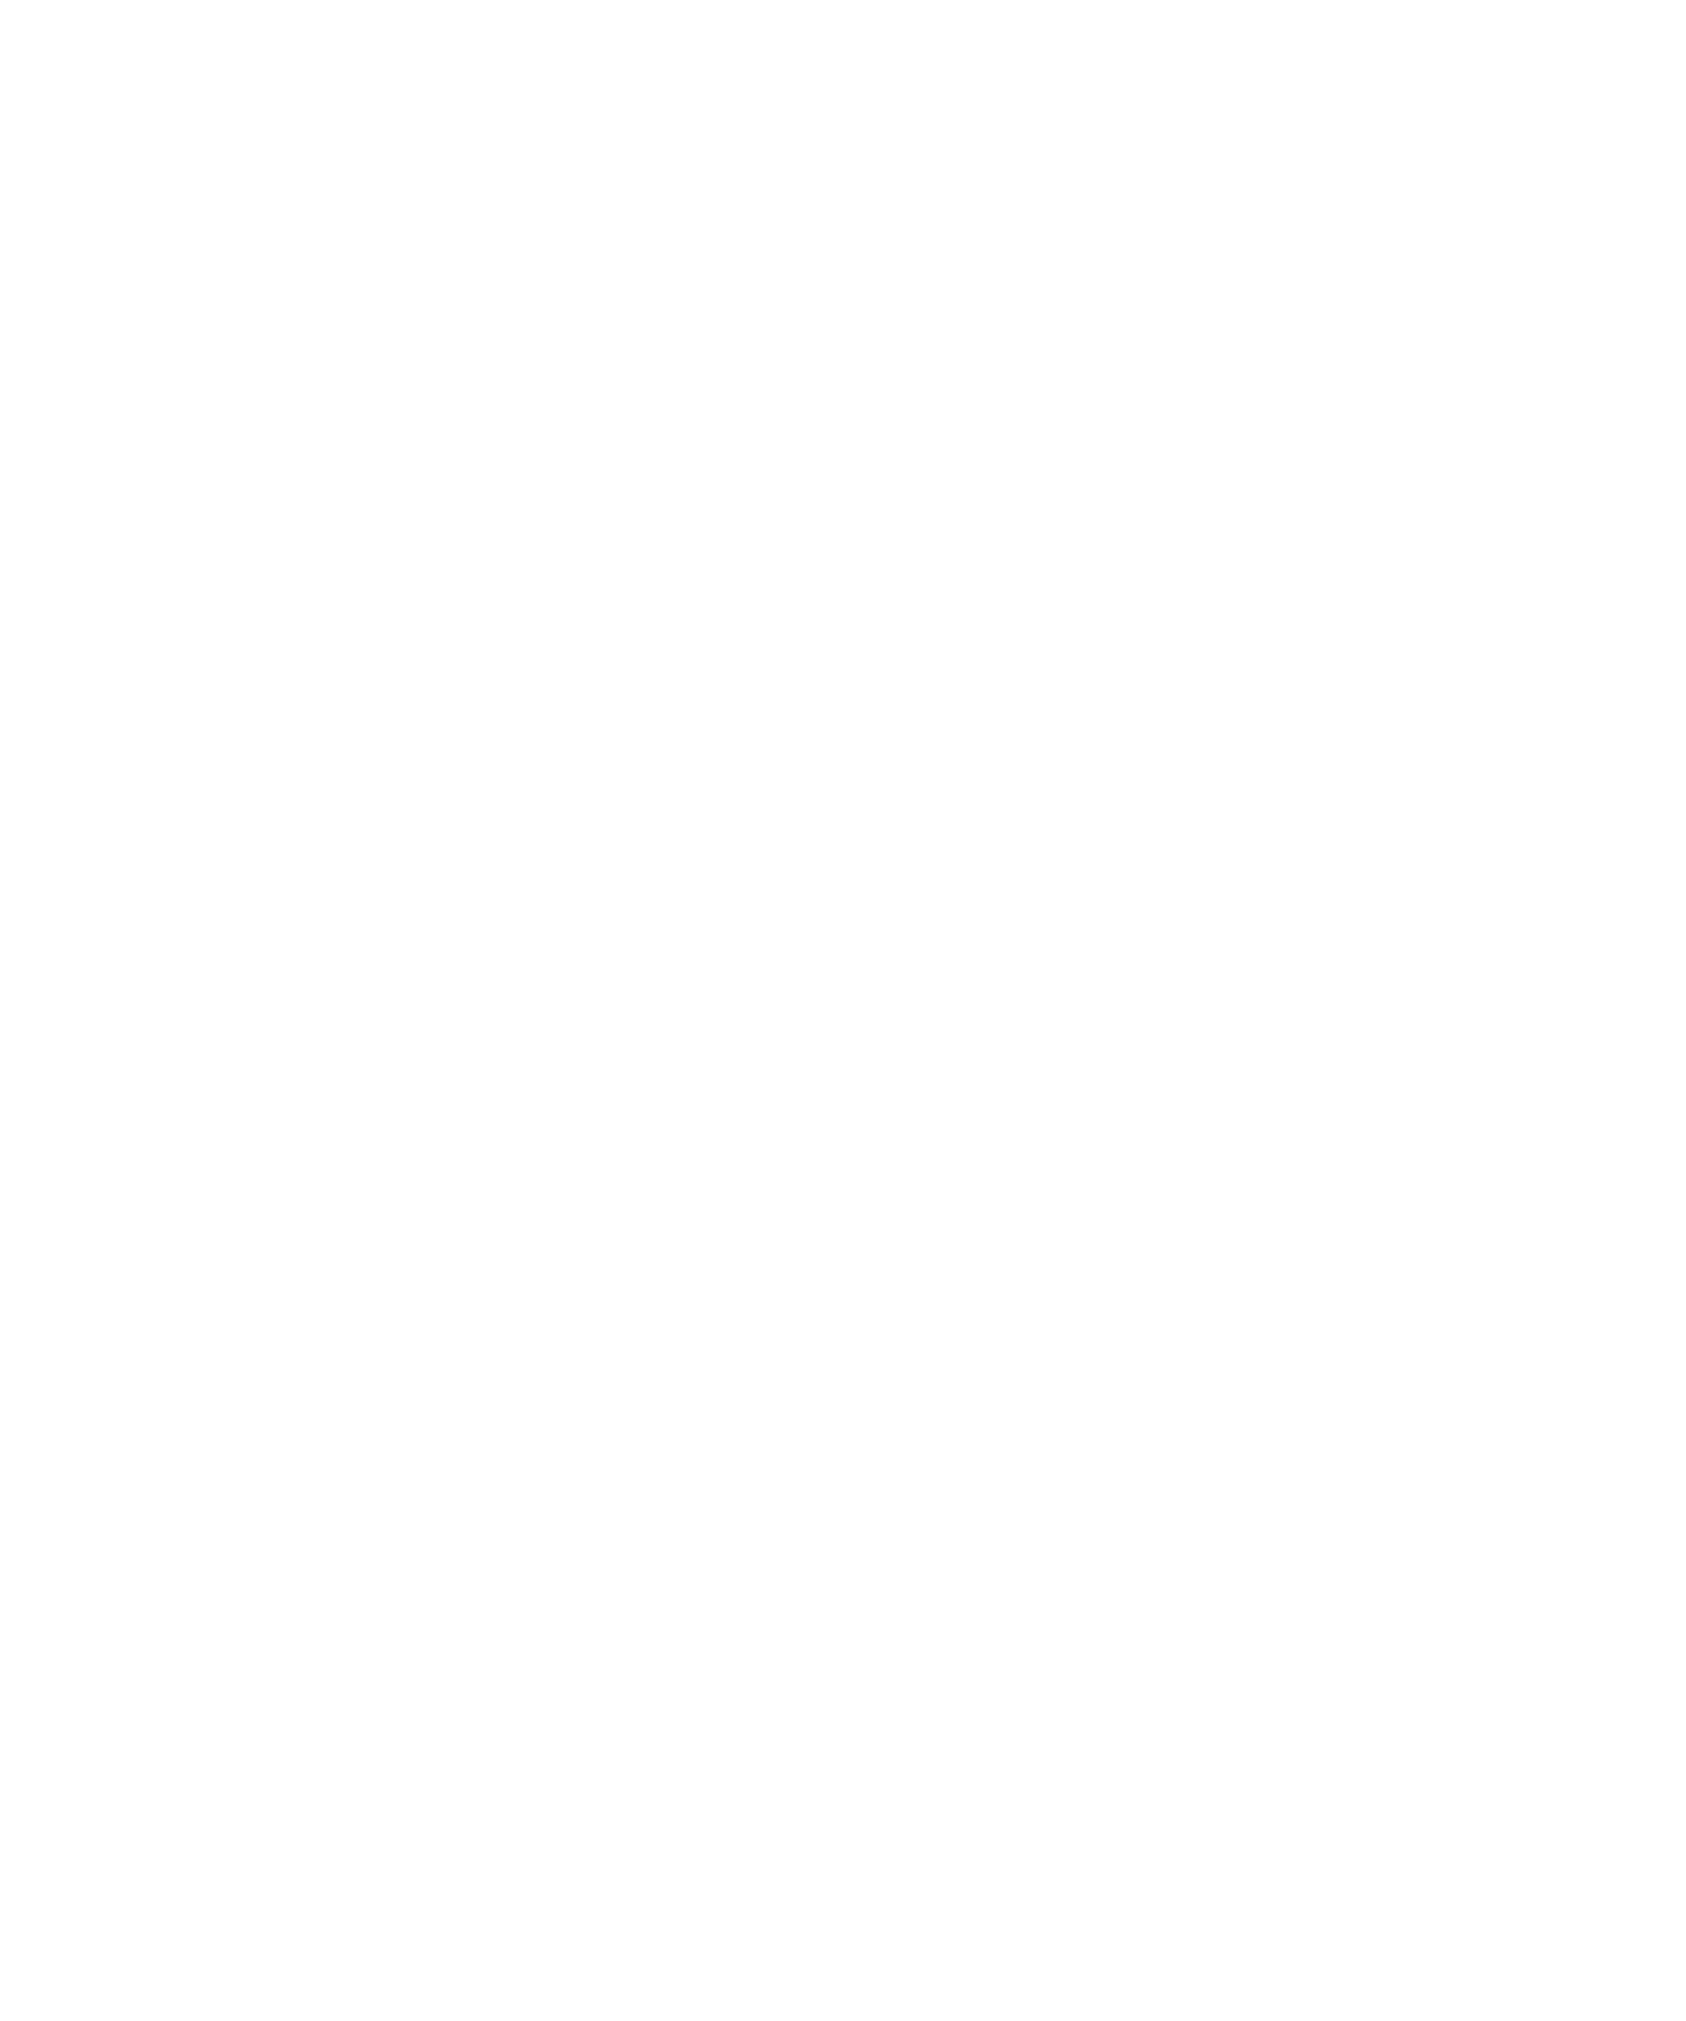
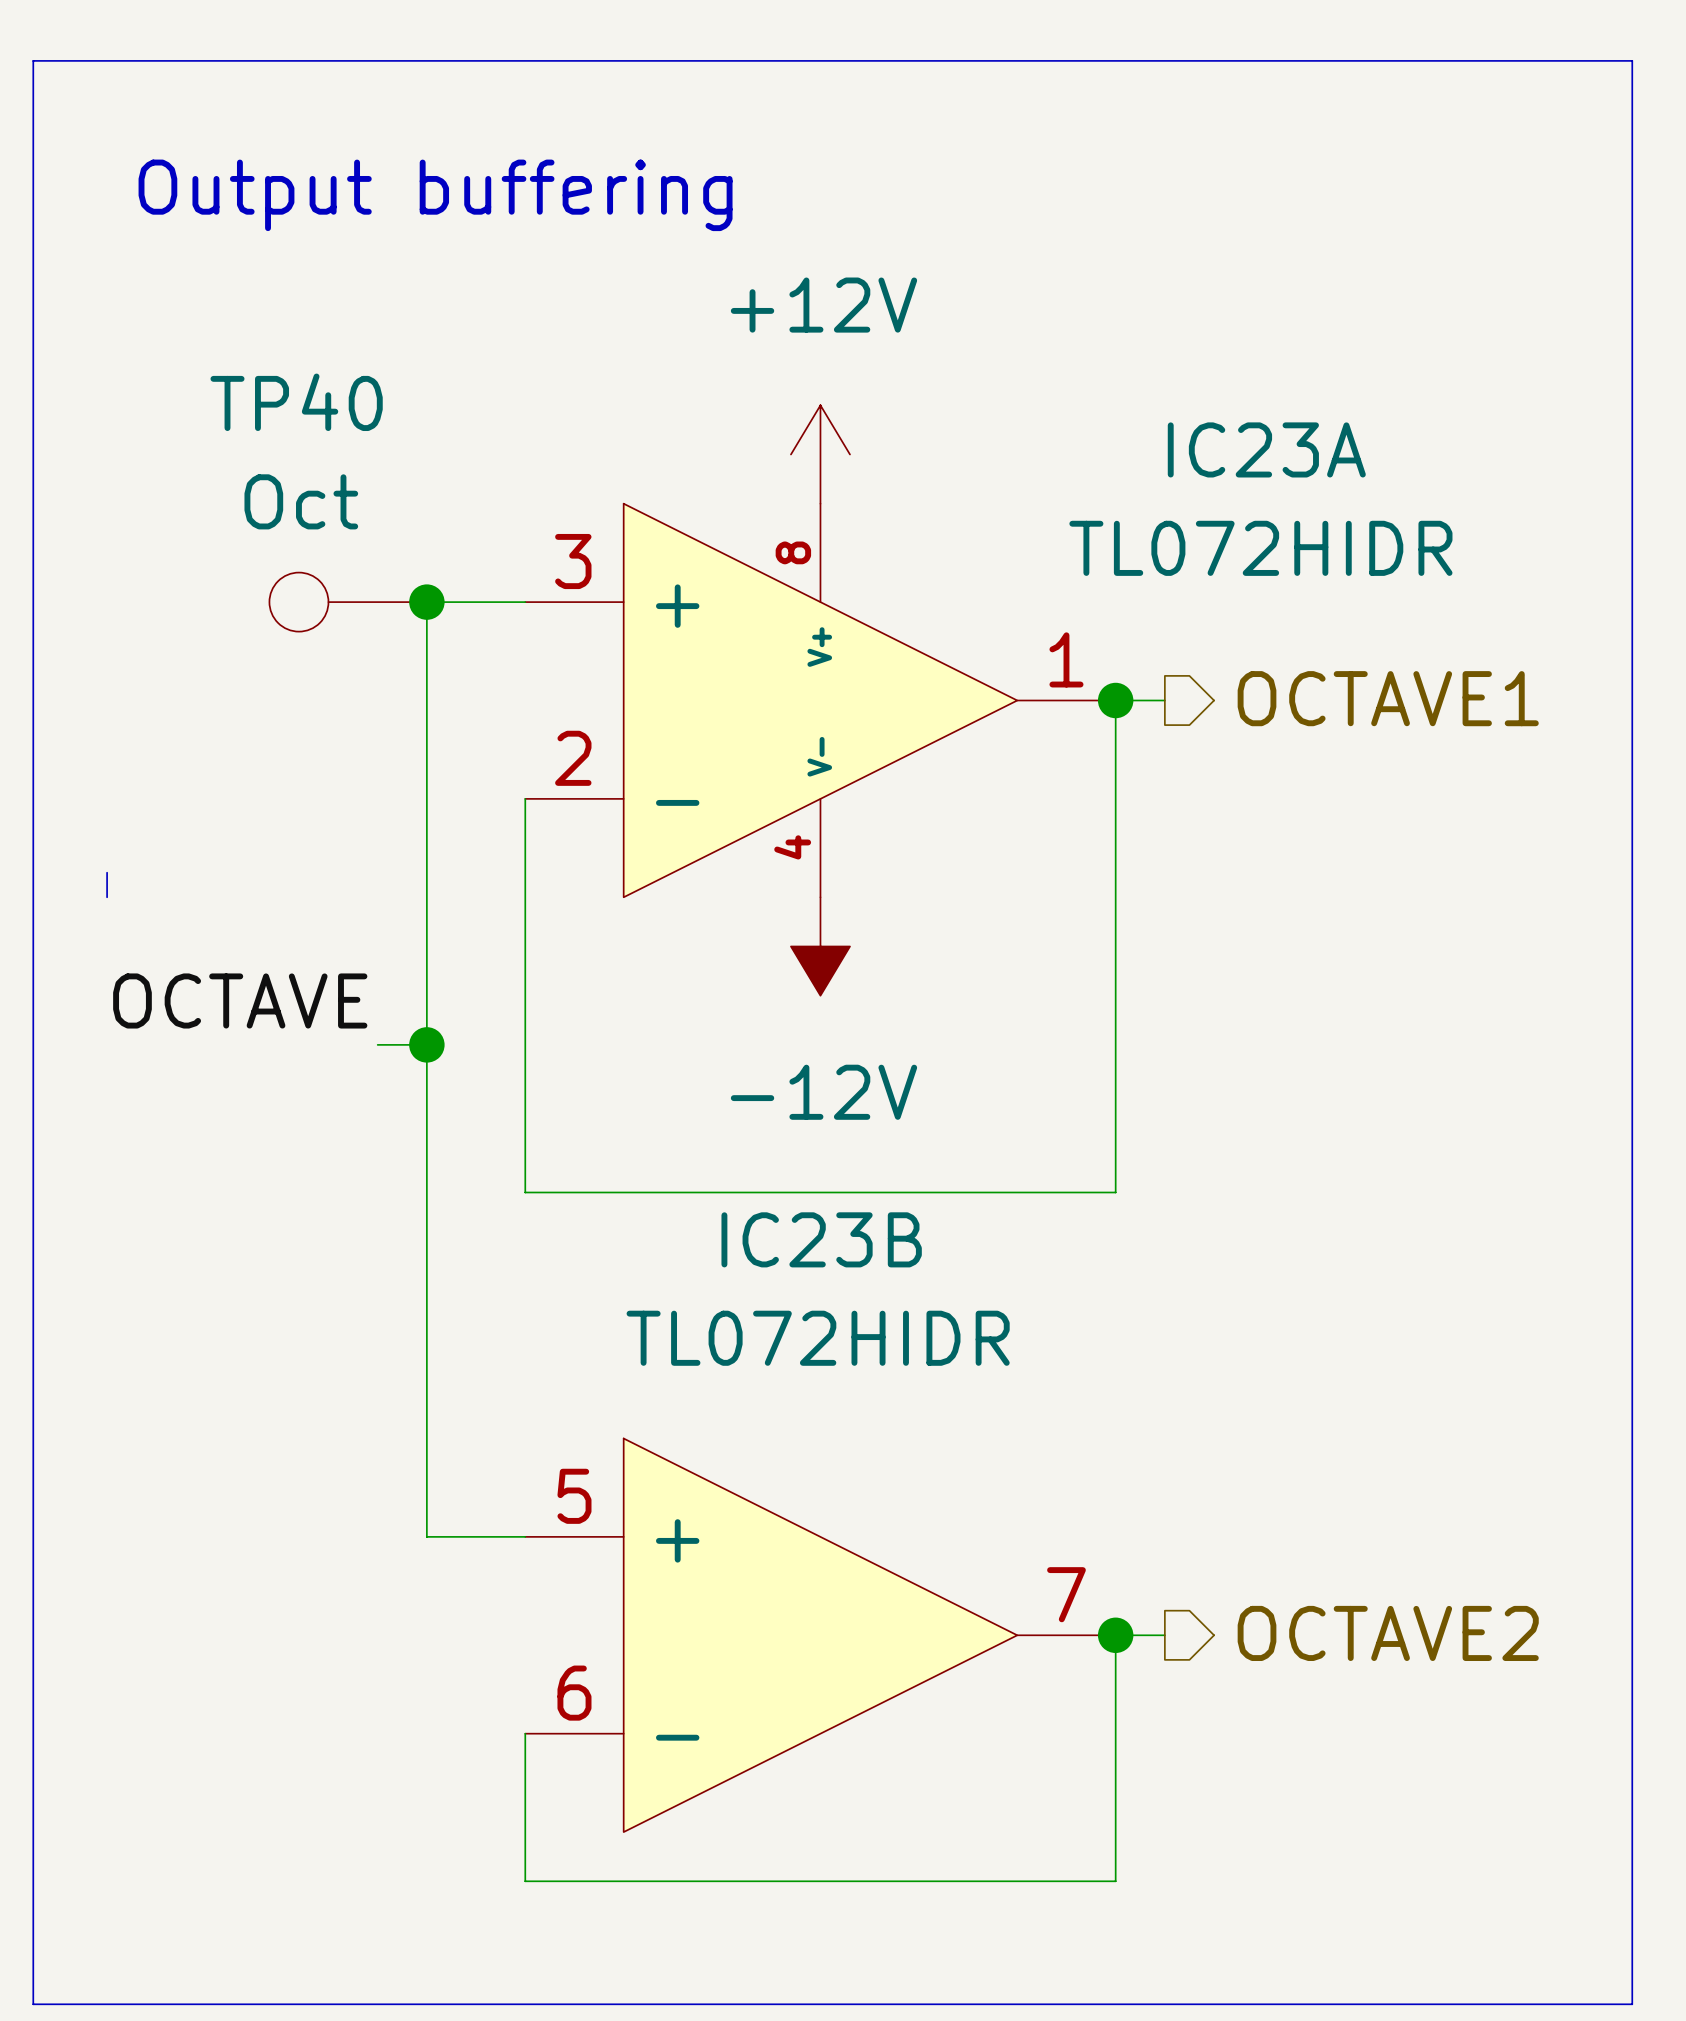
line: none -> (33, 60) (1632, 60) (1632, 2004) (33, 2004) (33, 60)
text: none -> Output buffering (435, 195)
power symbol: none -> +12V (820, 454)
TP40: none -> Oct (348, 602)
junction: none -> (426, 602)
wire: none -> (525, 602) (426, 602) (426, 1536) (525, 1536)
hierarchical label: none -> OCTAVE1 (1388, 698)
IC23A: none -> TL072HIDR (820, 700)
junction: none -> (1115, 700)
wire: none -> (1164, 700) (1115, 700) (1115, 1192) (525, 1192) (525, 798)
line: none -> (107, 872) (107, 897)
power symbol: none -> -12V (820, 946)
label: none -> OCTAVE (240, 1000)
wire: none -> (377, 1044) (426, 1044)
junction: none -> (426, 1044)
hierarchical label: none -> OCTAVE2 (1388, 1633)
IC23B: none -> TL072HIDR (820, 1635)
junction: none -> (1115, 1635)
wire: none -> (1164, 1635) (1115, 1635) (1115, 1881) (525, 1881) (525, 1733)

